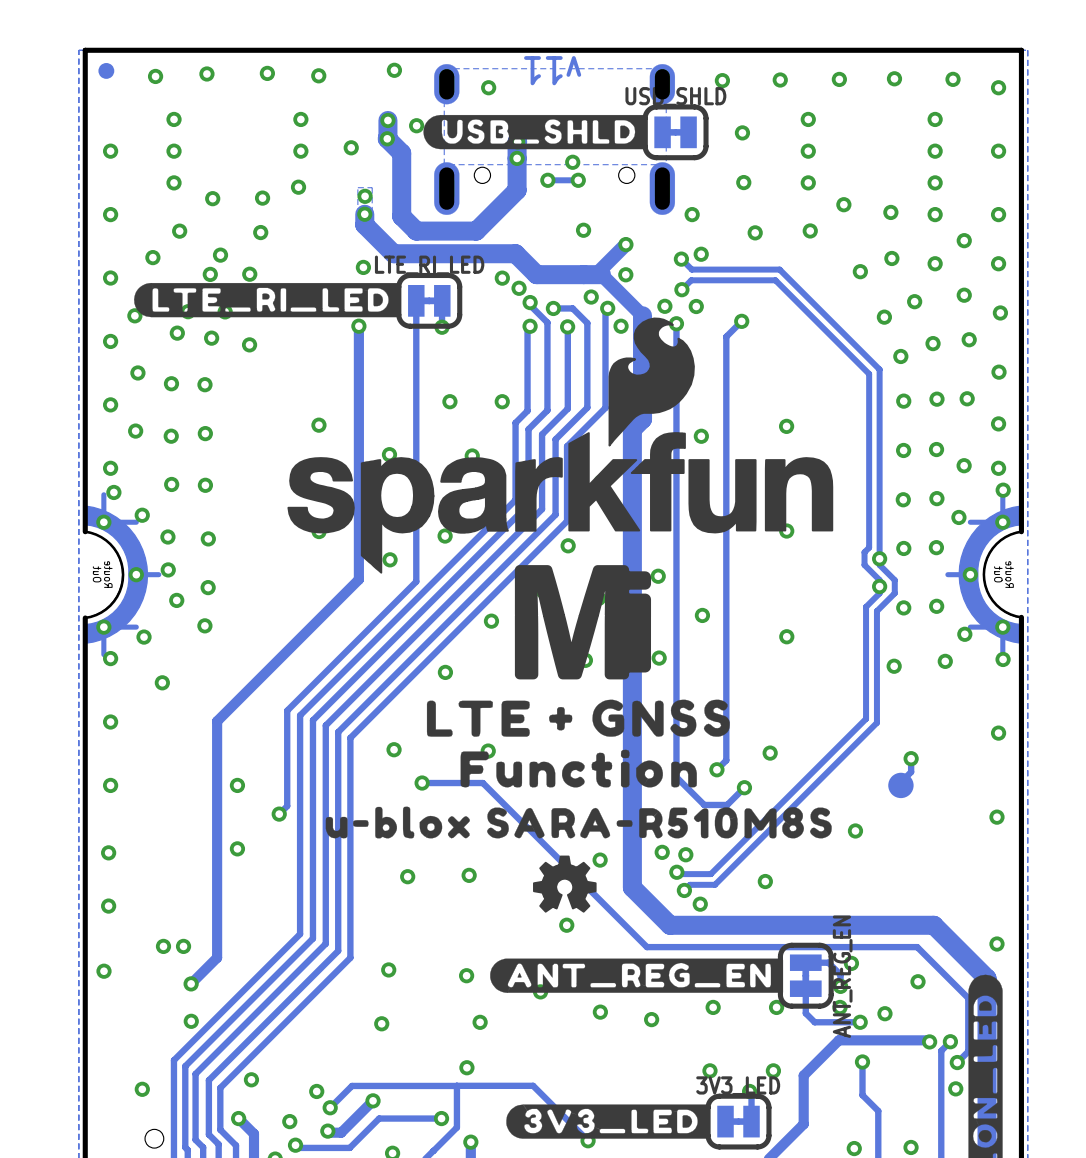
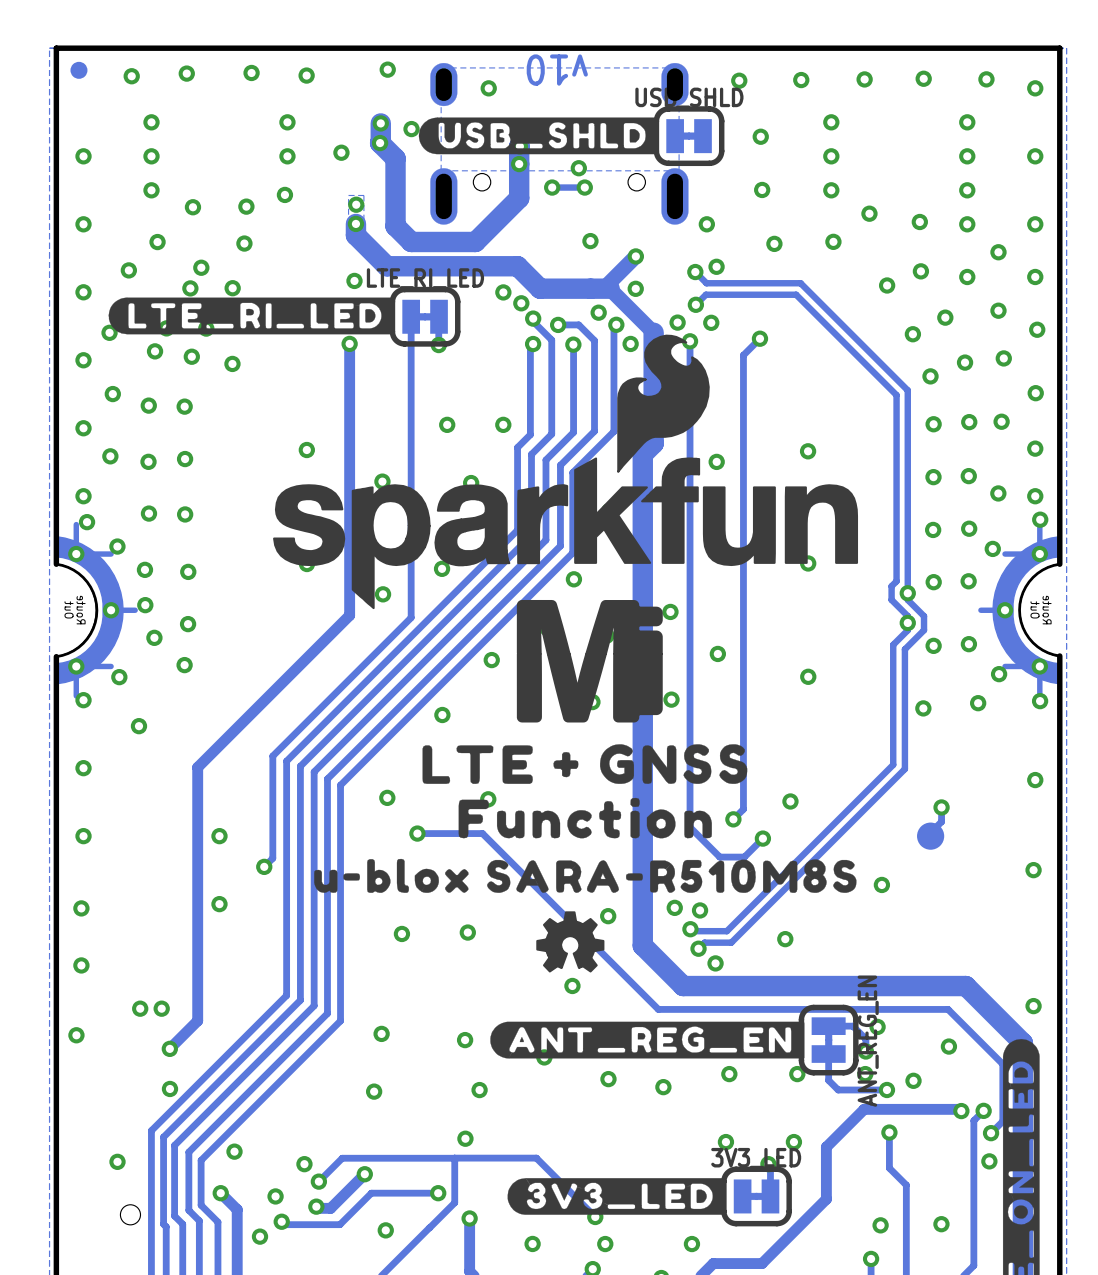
text: v11 (552, 70) -> v10 (557, 70)

